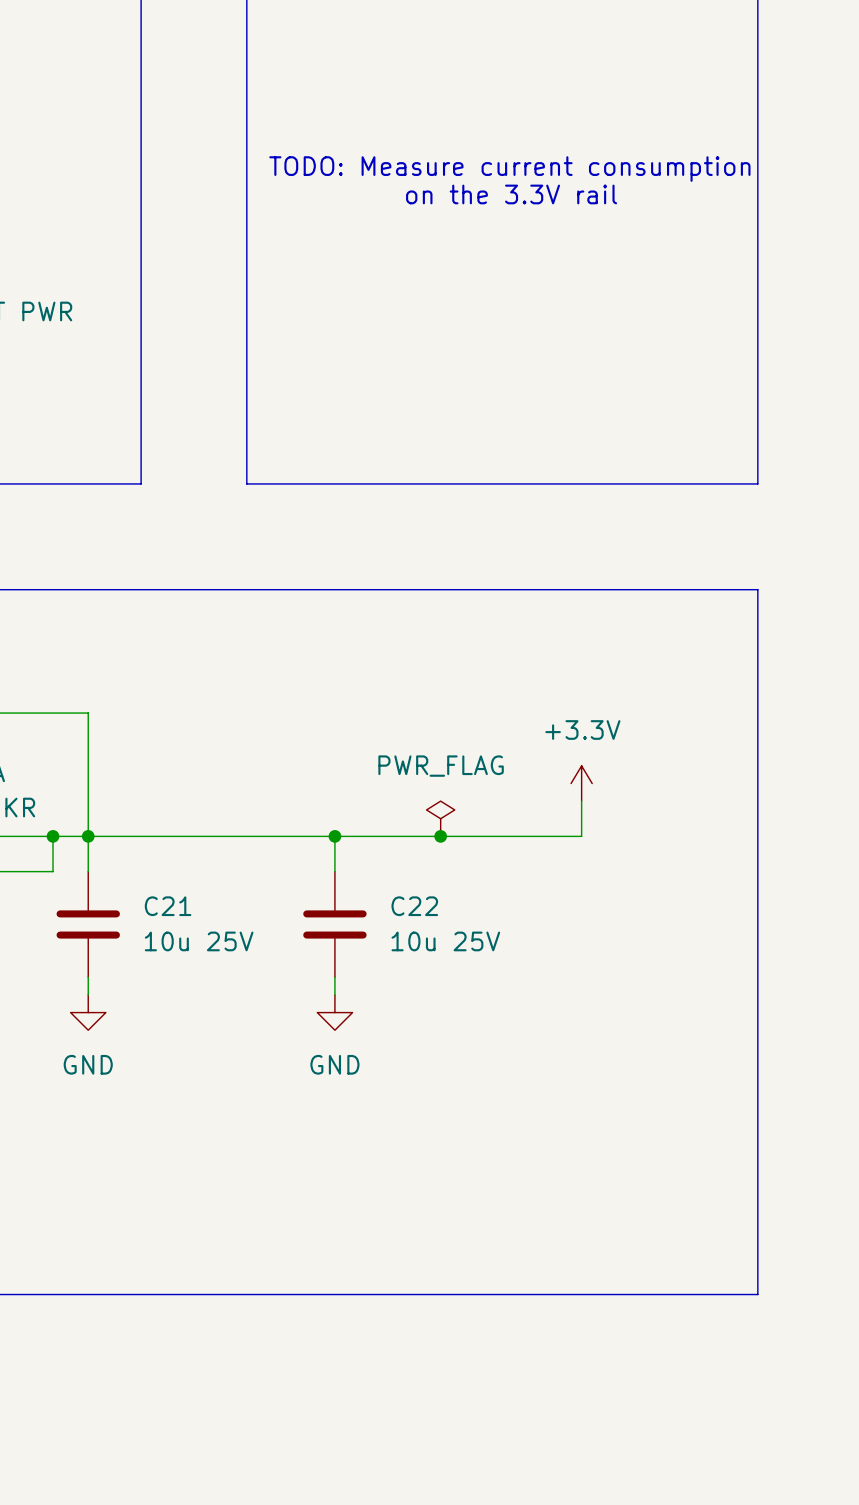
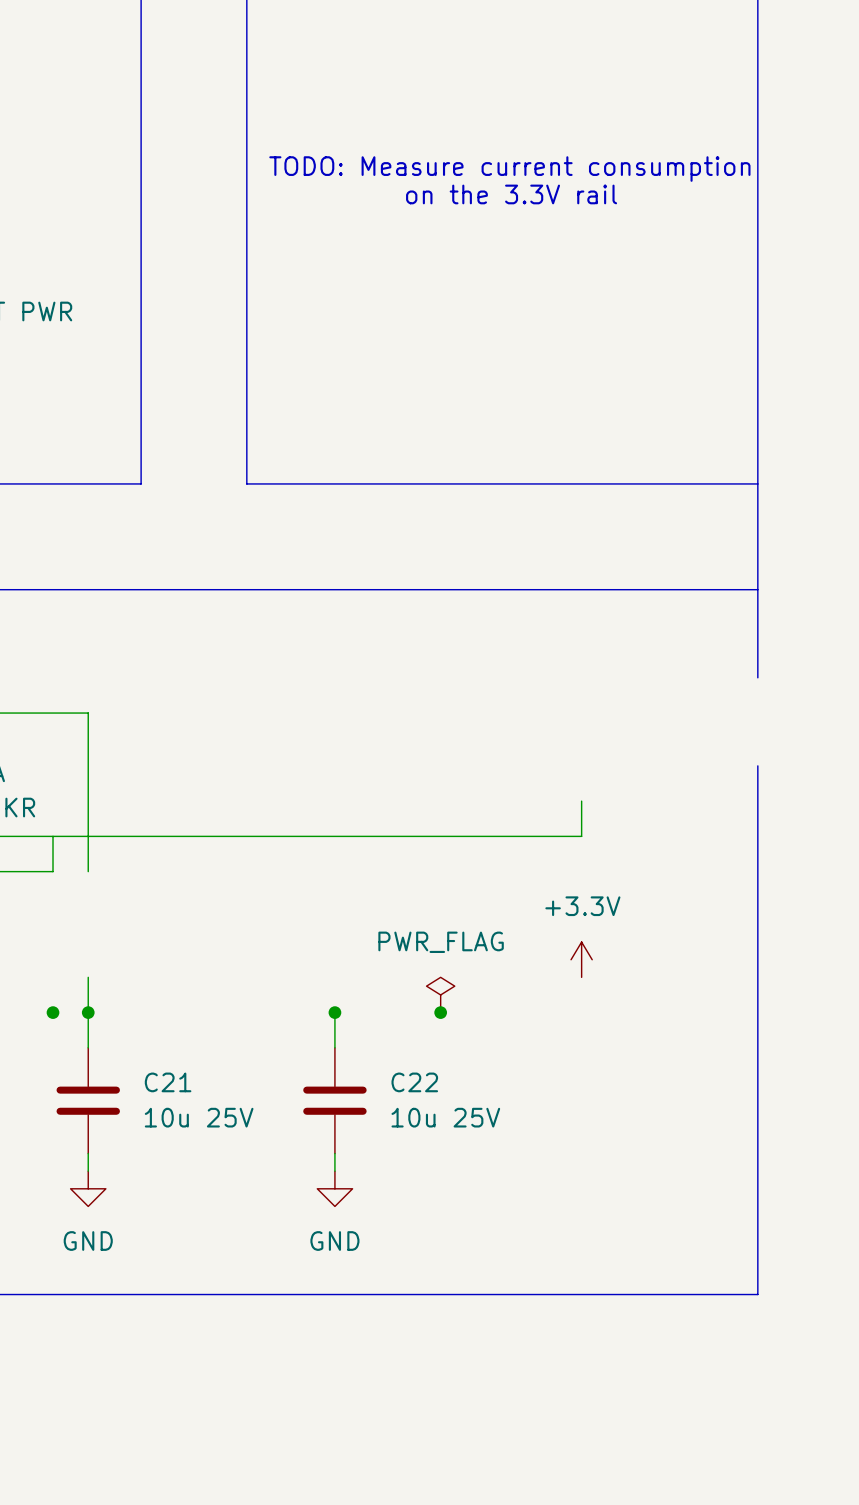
line: none -> (757, 483) (757, 589)
line: (757, 677) (757, 765) -> none
power symbol position: +3.3V (581, 783) -> +3.3V (581, 959)
power symbol position: PWR_FLAG (440, 818) -> PWR_FLAG (440, 994)
junction: (53, 836) -> none
junction: (88, 836) -> none
wire: (334, 836) (334, 871) -> (334, 1012) (334, 1047)
junction: (334, 836) -> none
junction: (440, 836) -> none
C21 position: (88, 924) -> (88, 1100)
C22 position: (334, 924) -> (334, 1100)
wire: (334, 977) (334, 994) -> (334, 1153) (334, 1171)
wire: none -> (88, 994) (88, 1047)
junction: none -> (53, 1012)
junction: none -> (88, 1012)
power symbol: GND (88, 1012) -> none
junction: none -> (334, 1012)
power symbol: GND (334, 1012) -> none
junction: none -> (440, 1012)
wire: none -> (88, 1153) (88, 1171)
power symbol: none -> GND (88, 1188)
power symbol: none -> GND (334, 1188)

